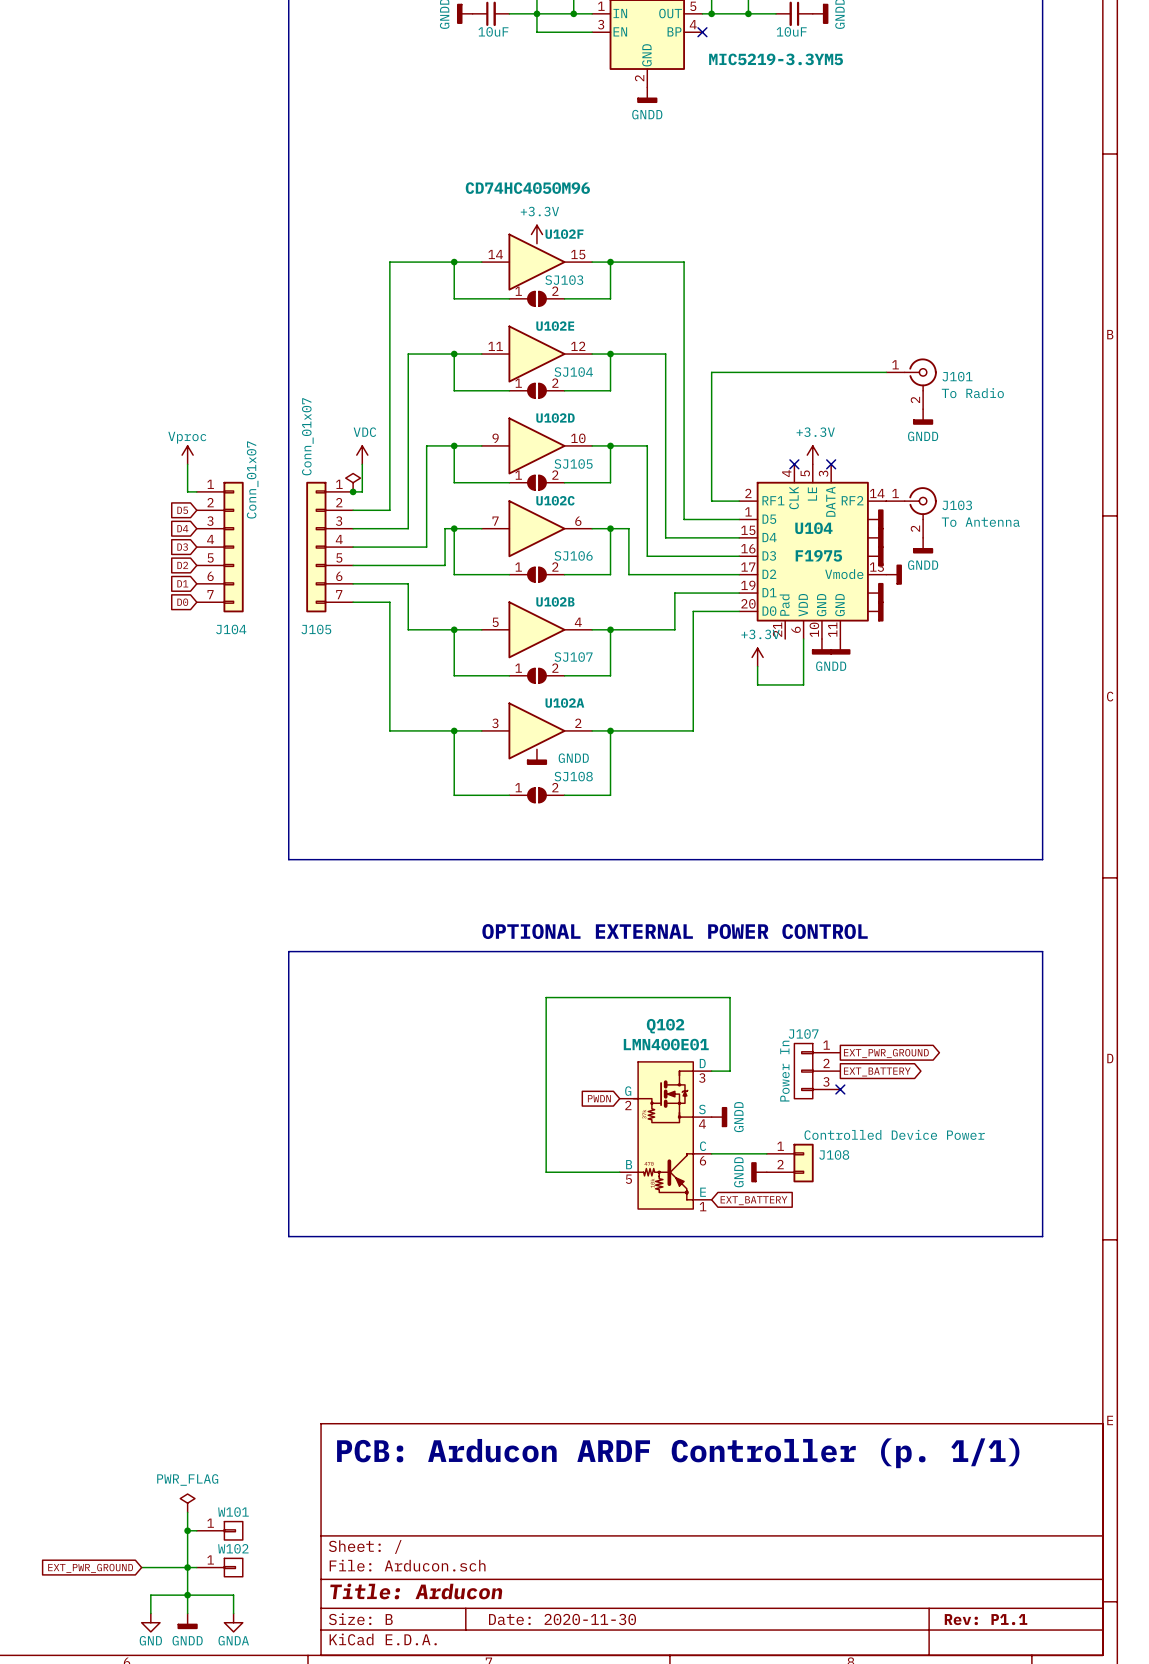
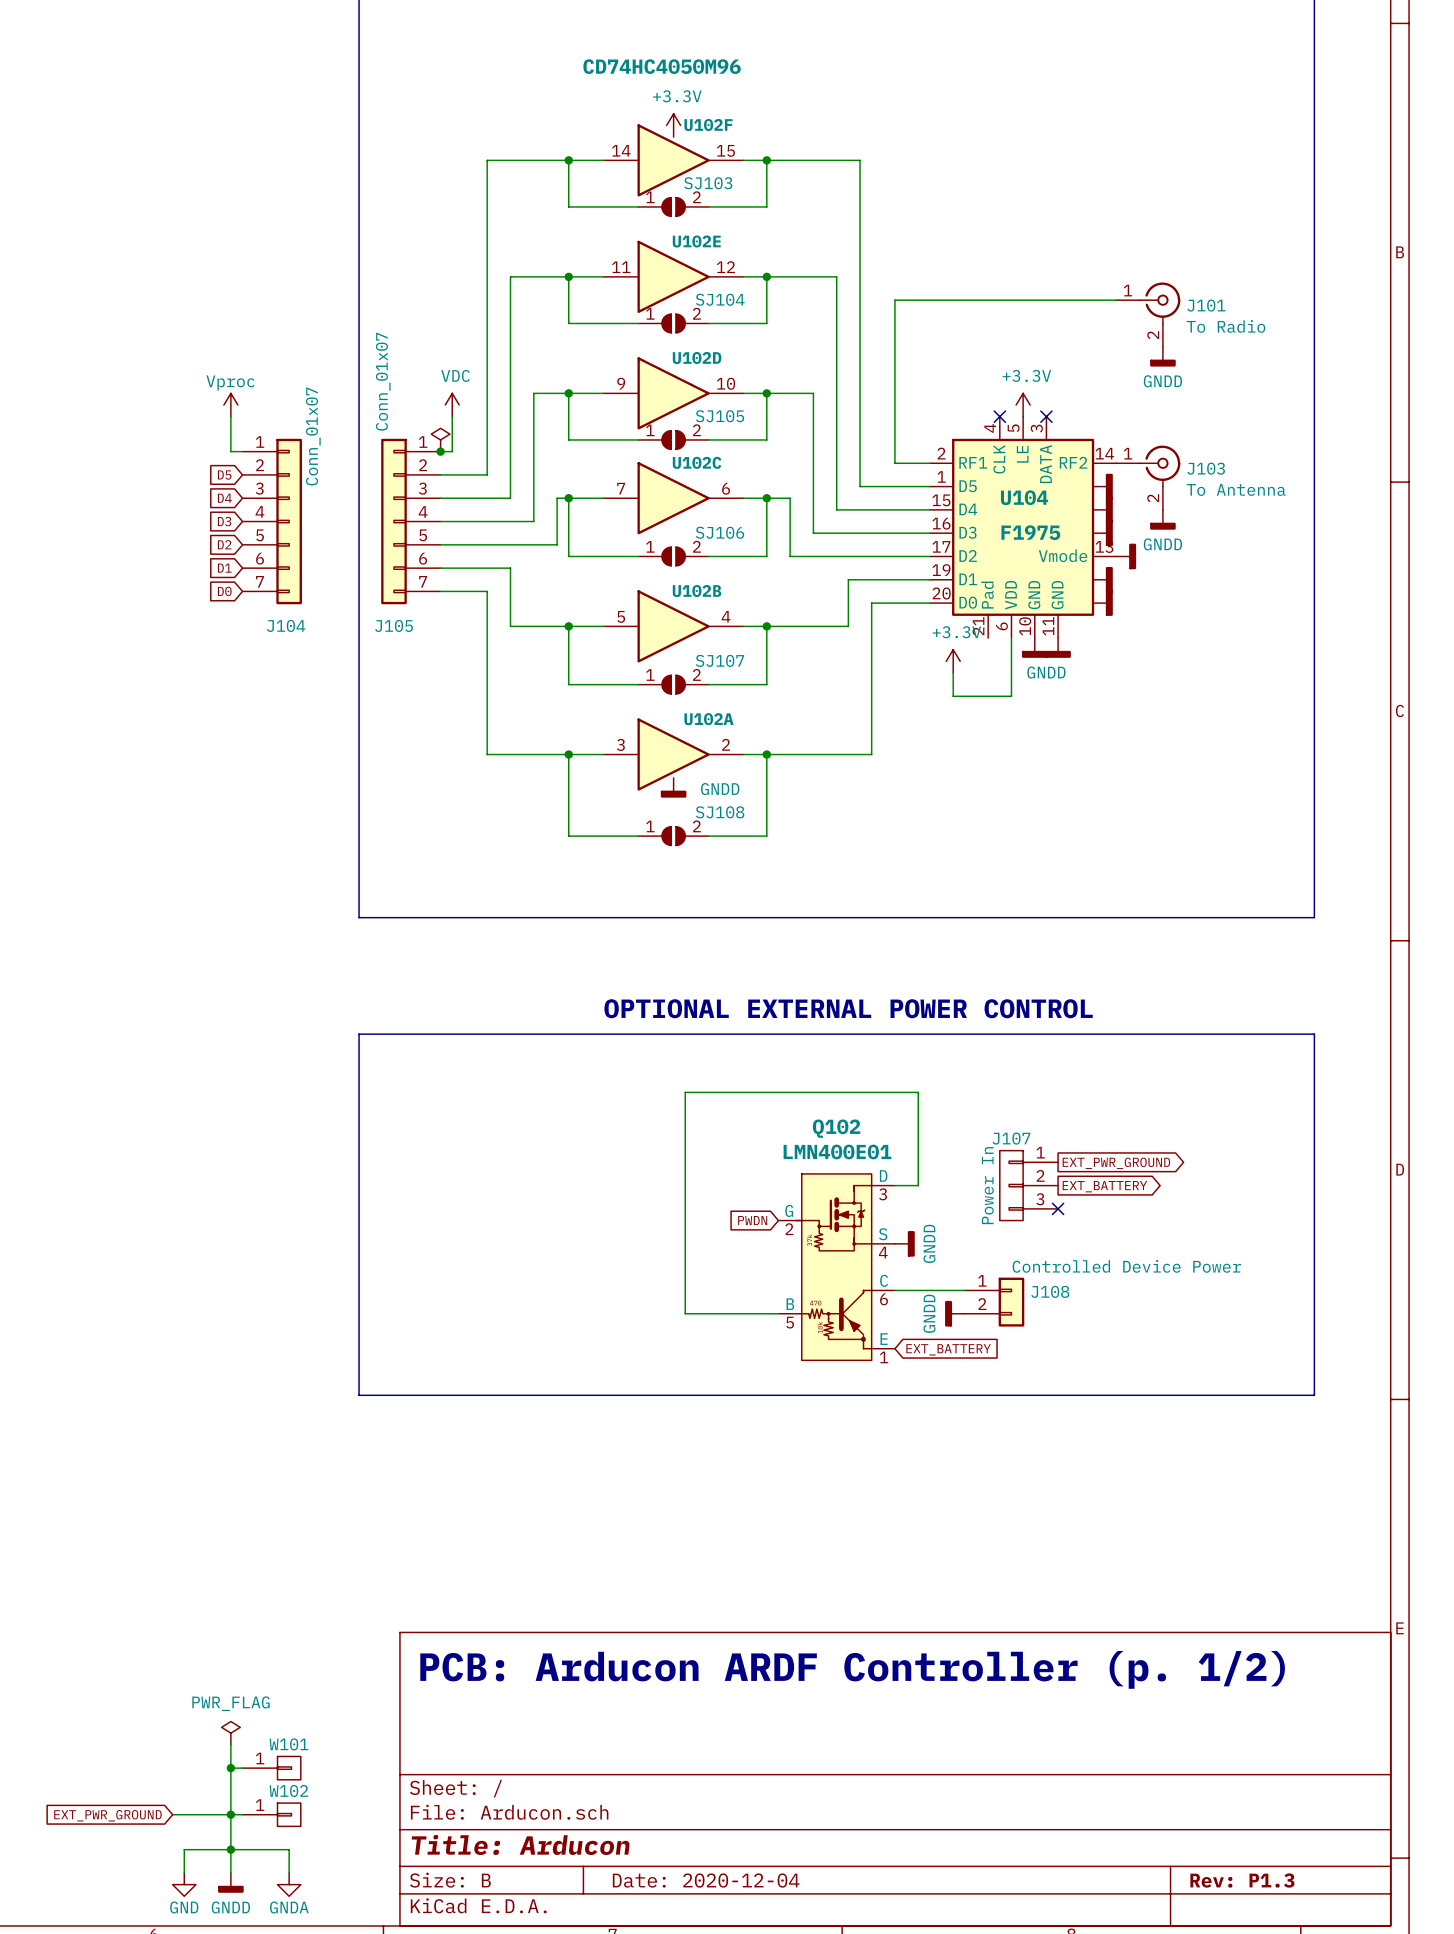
text: PCB: Arducon ARDF Controller (p. 1/1) (678, 1453) -> PCB: Arducon ARDF Controller (p. 1/2) (852, 1669)
title block: Date: 2020-11-30 (562, 1619) -> Date: 2020-12-04 (706, 1880)
title block: Rev: P1.1 (986, 1619) -> Rev: P1.3 (1242, 1880)

